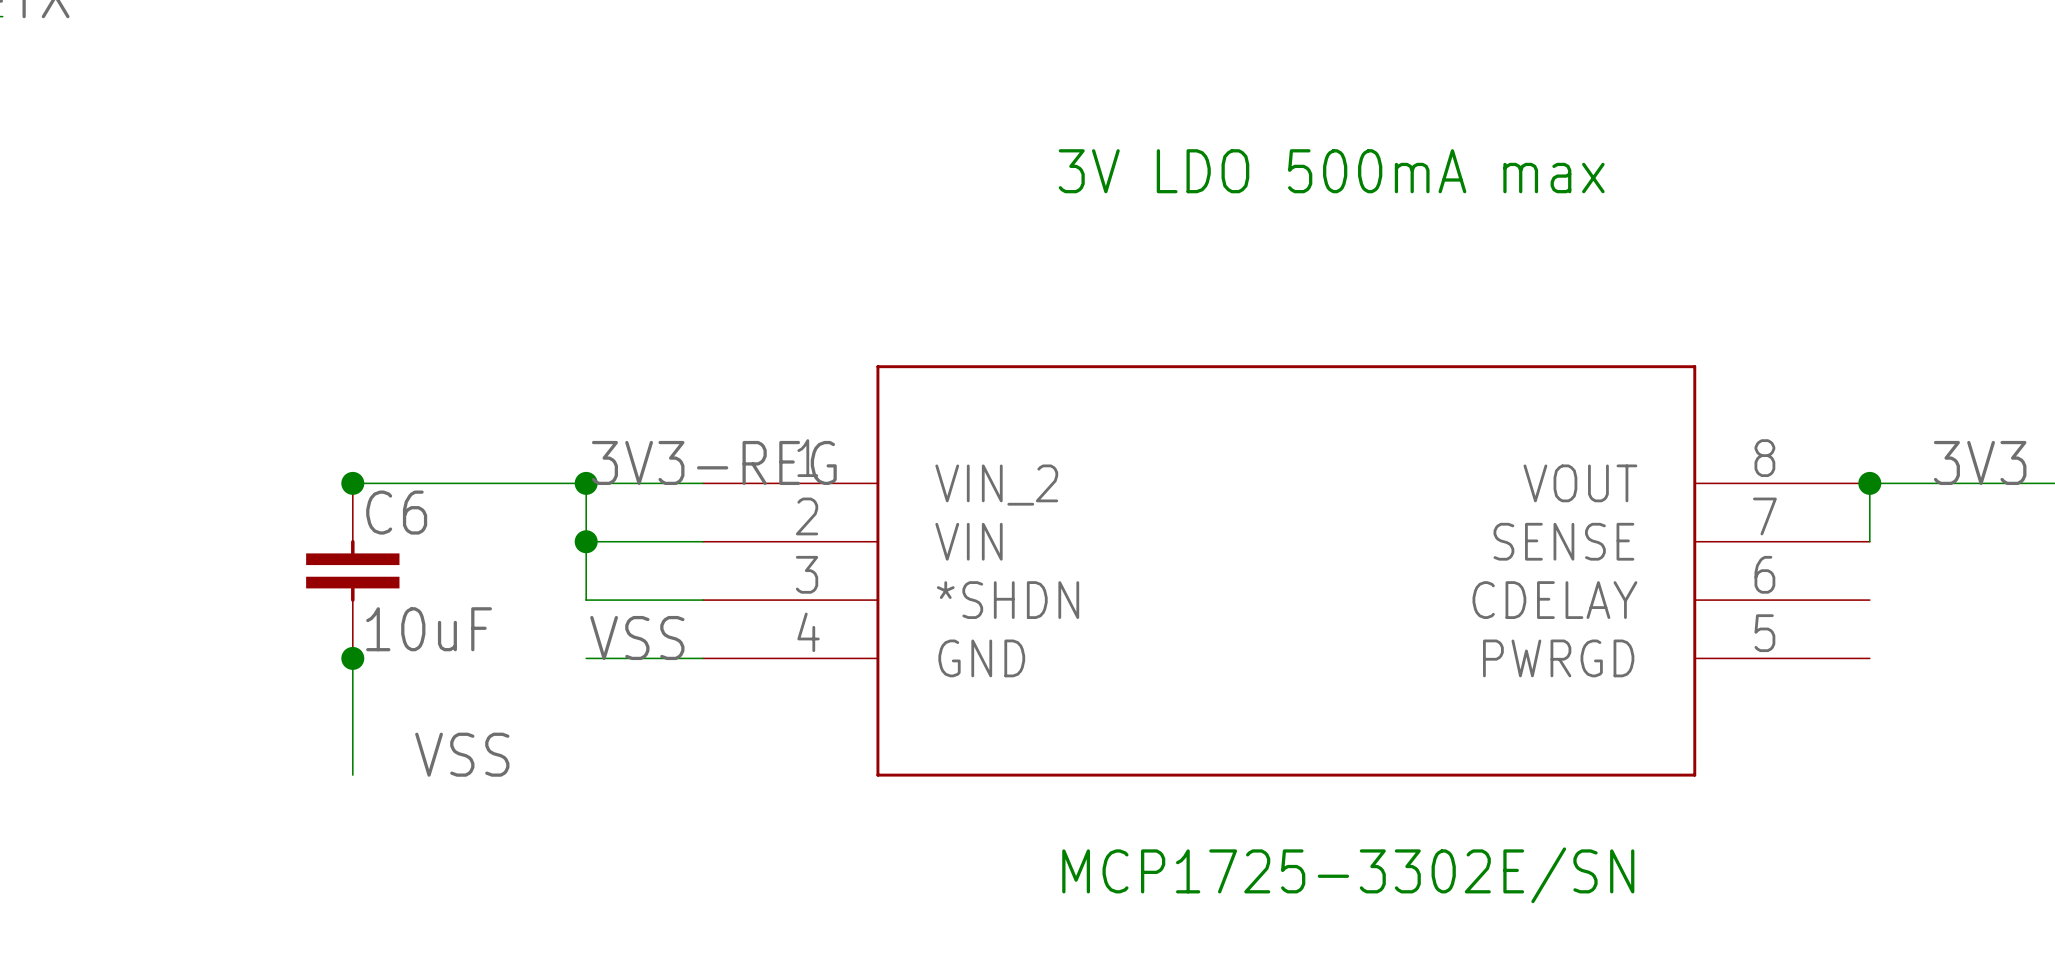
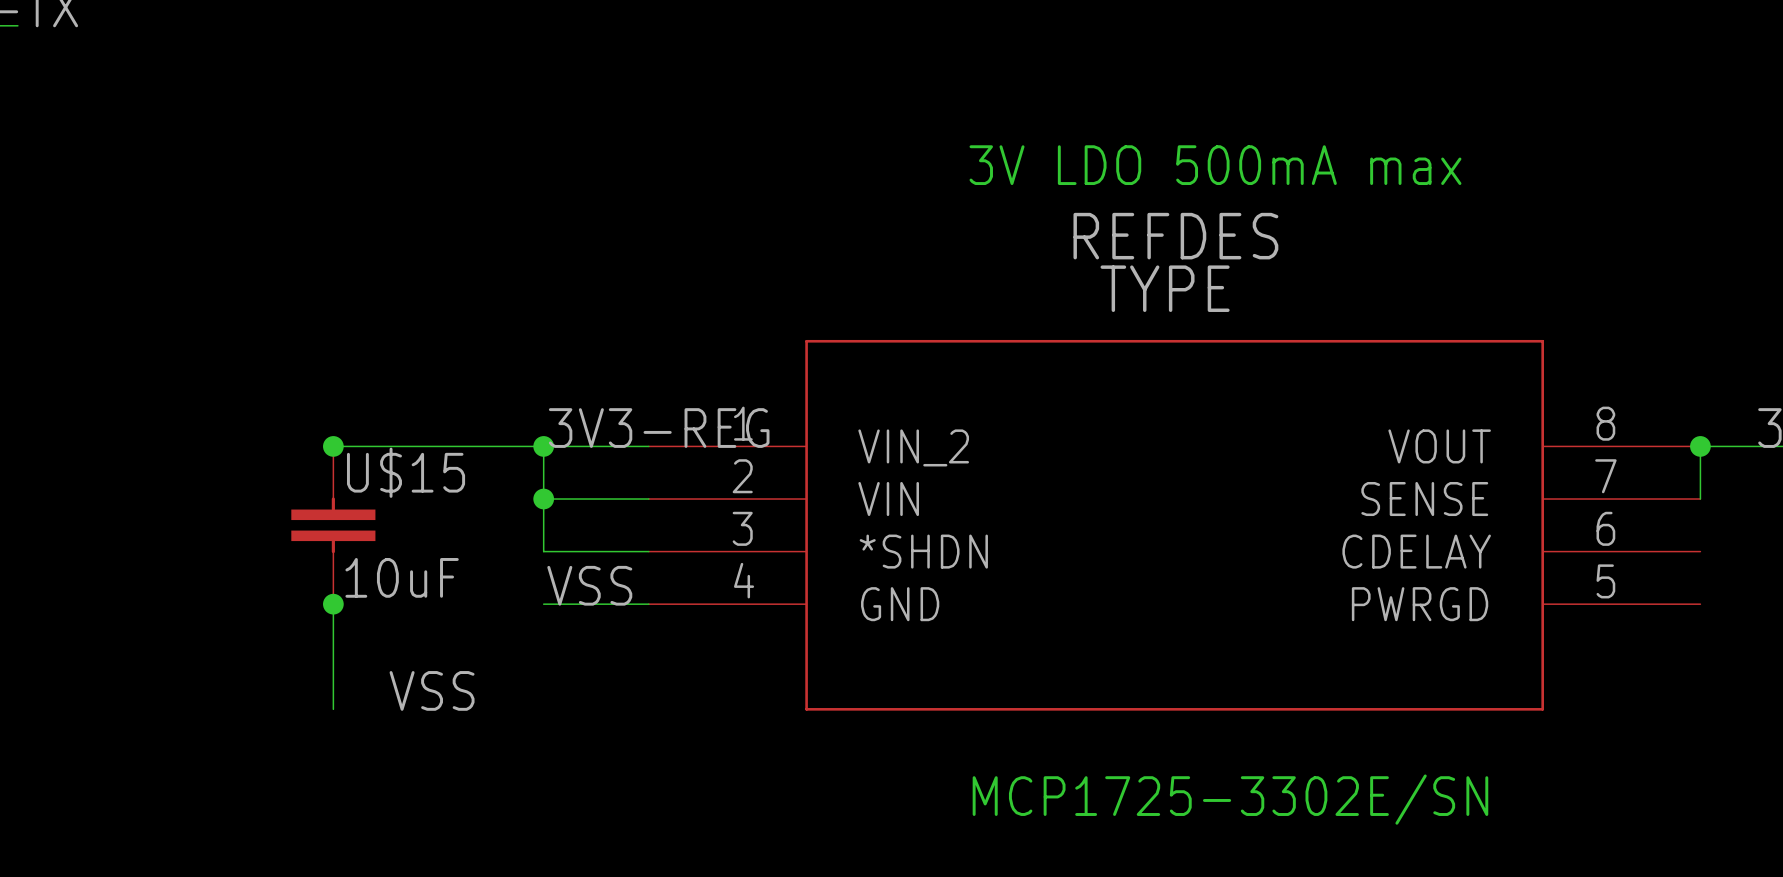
part text: none -> REFDES (1175, 236)
part text: none -> TYPE (1165, 288)
C6 name: C6 (396, 512) -> U$15 (406, 472)

